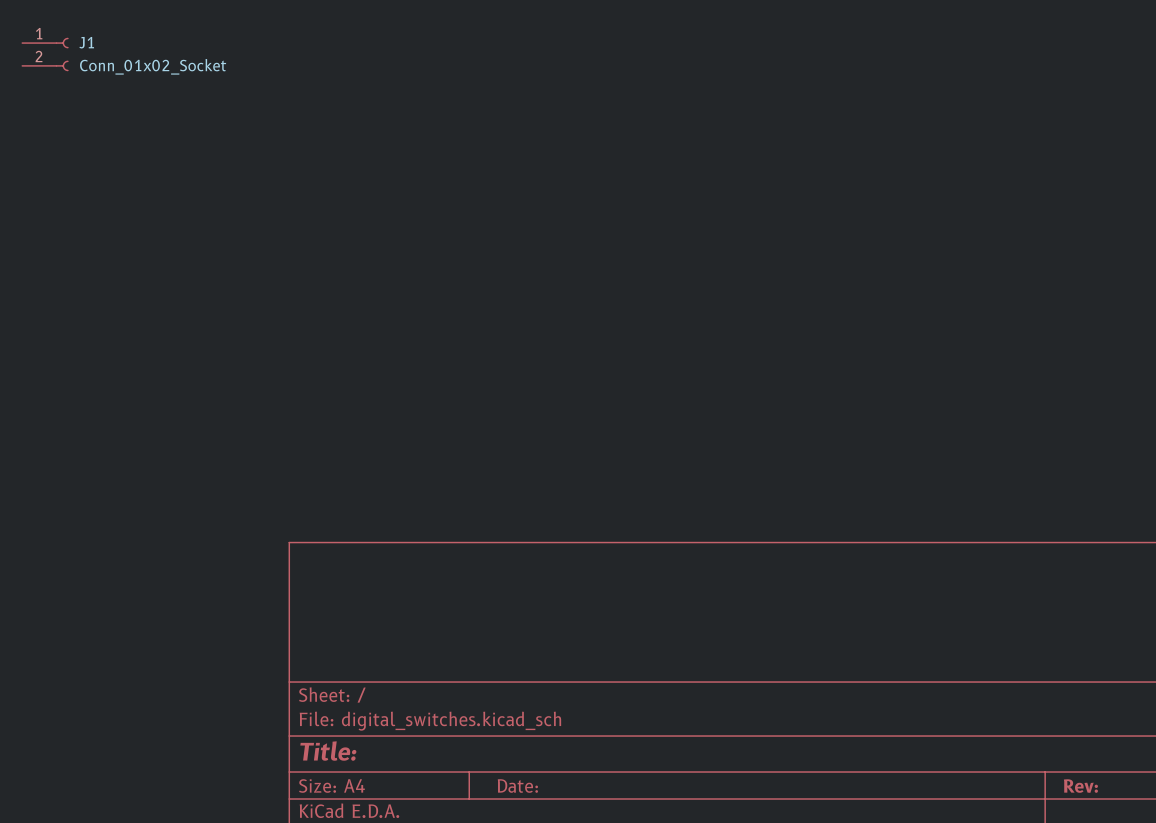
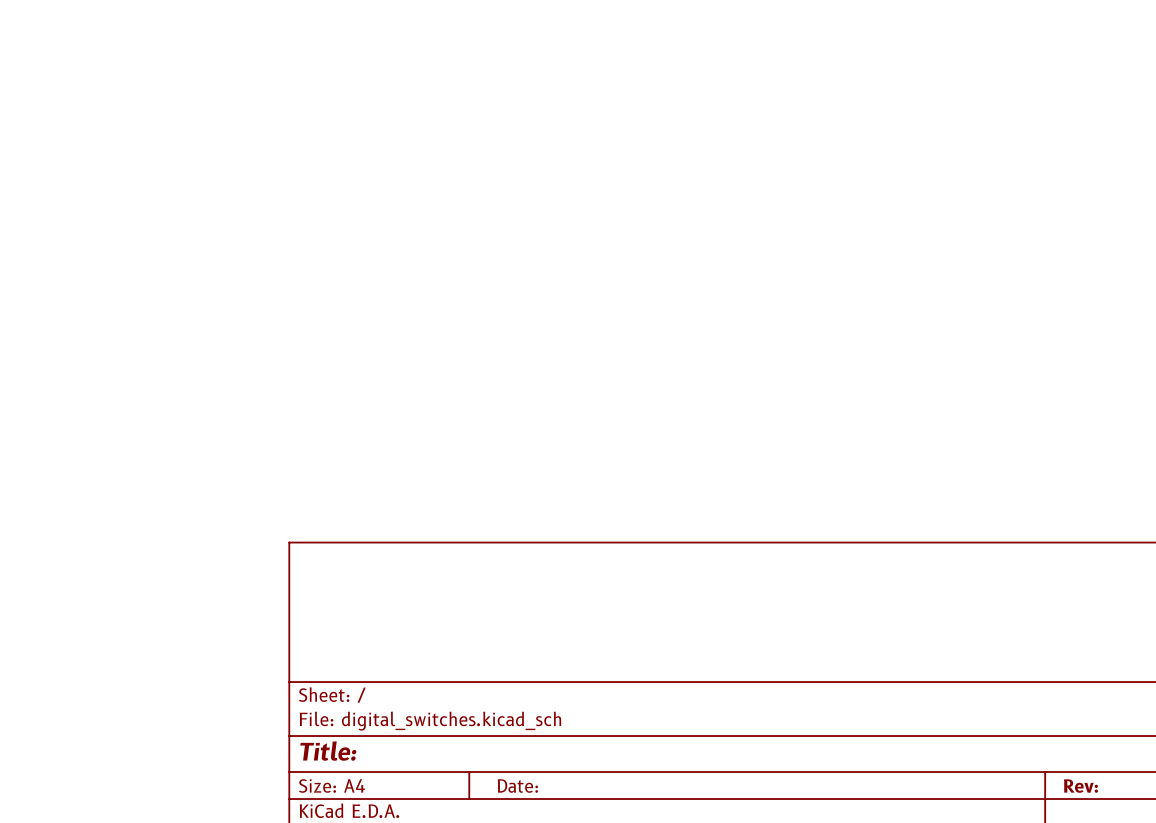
J1: Conn_01x02_Socket (45, 54) -> none

